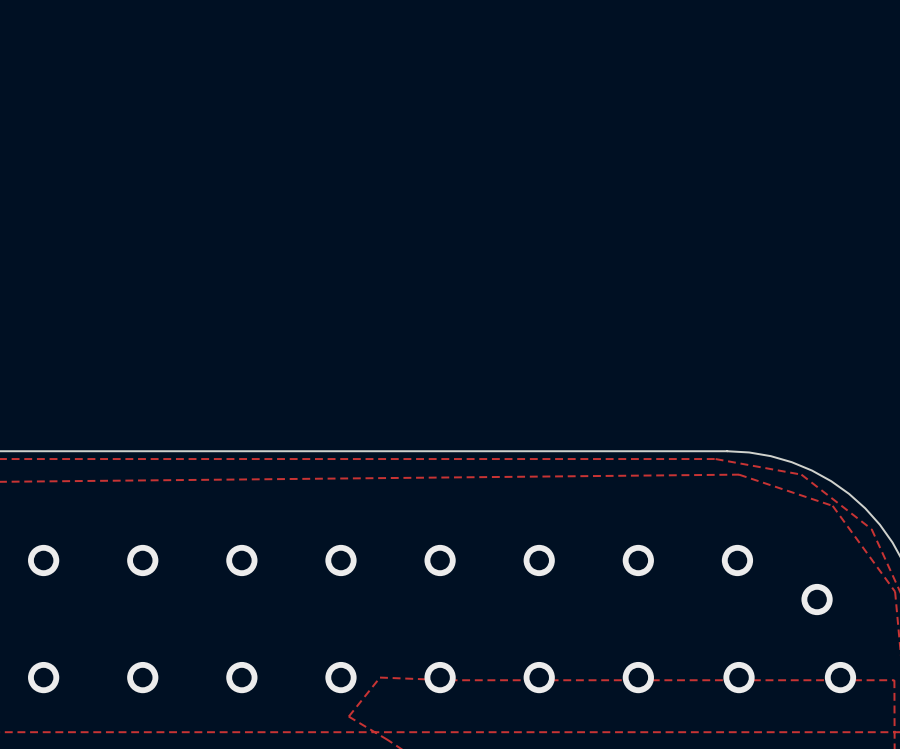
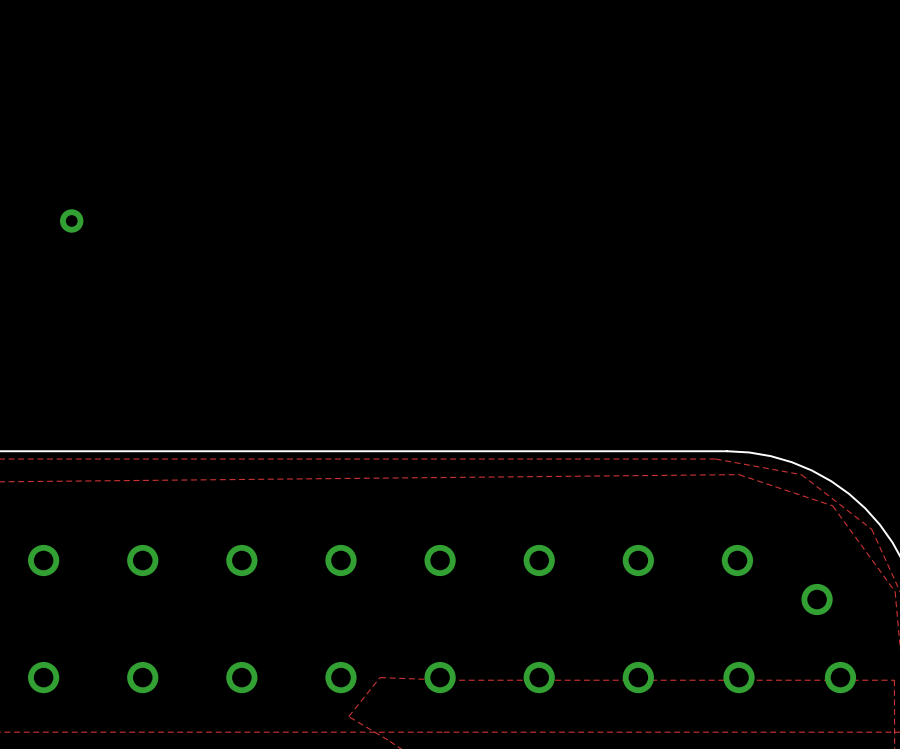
via: none -> (71, 220)

